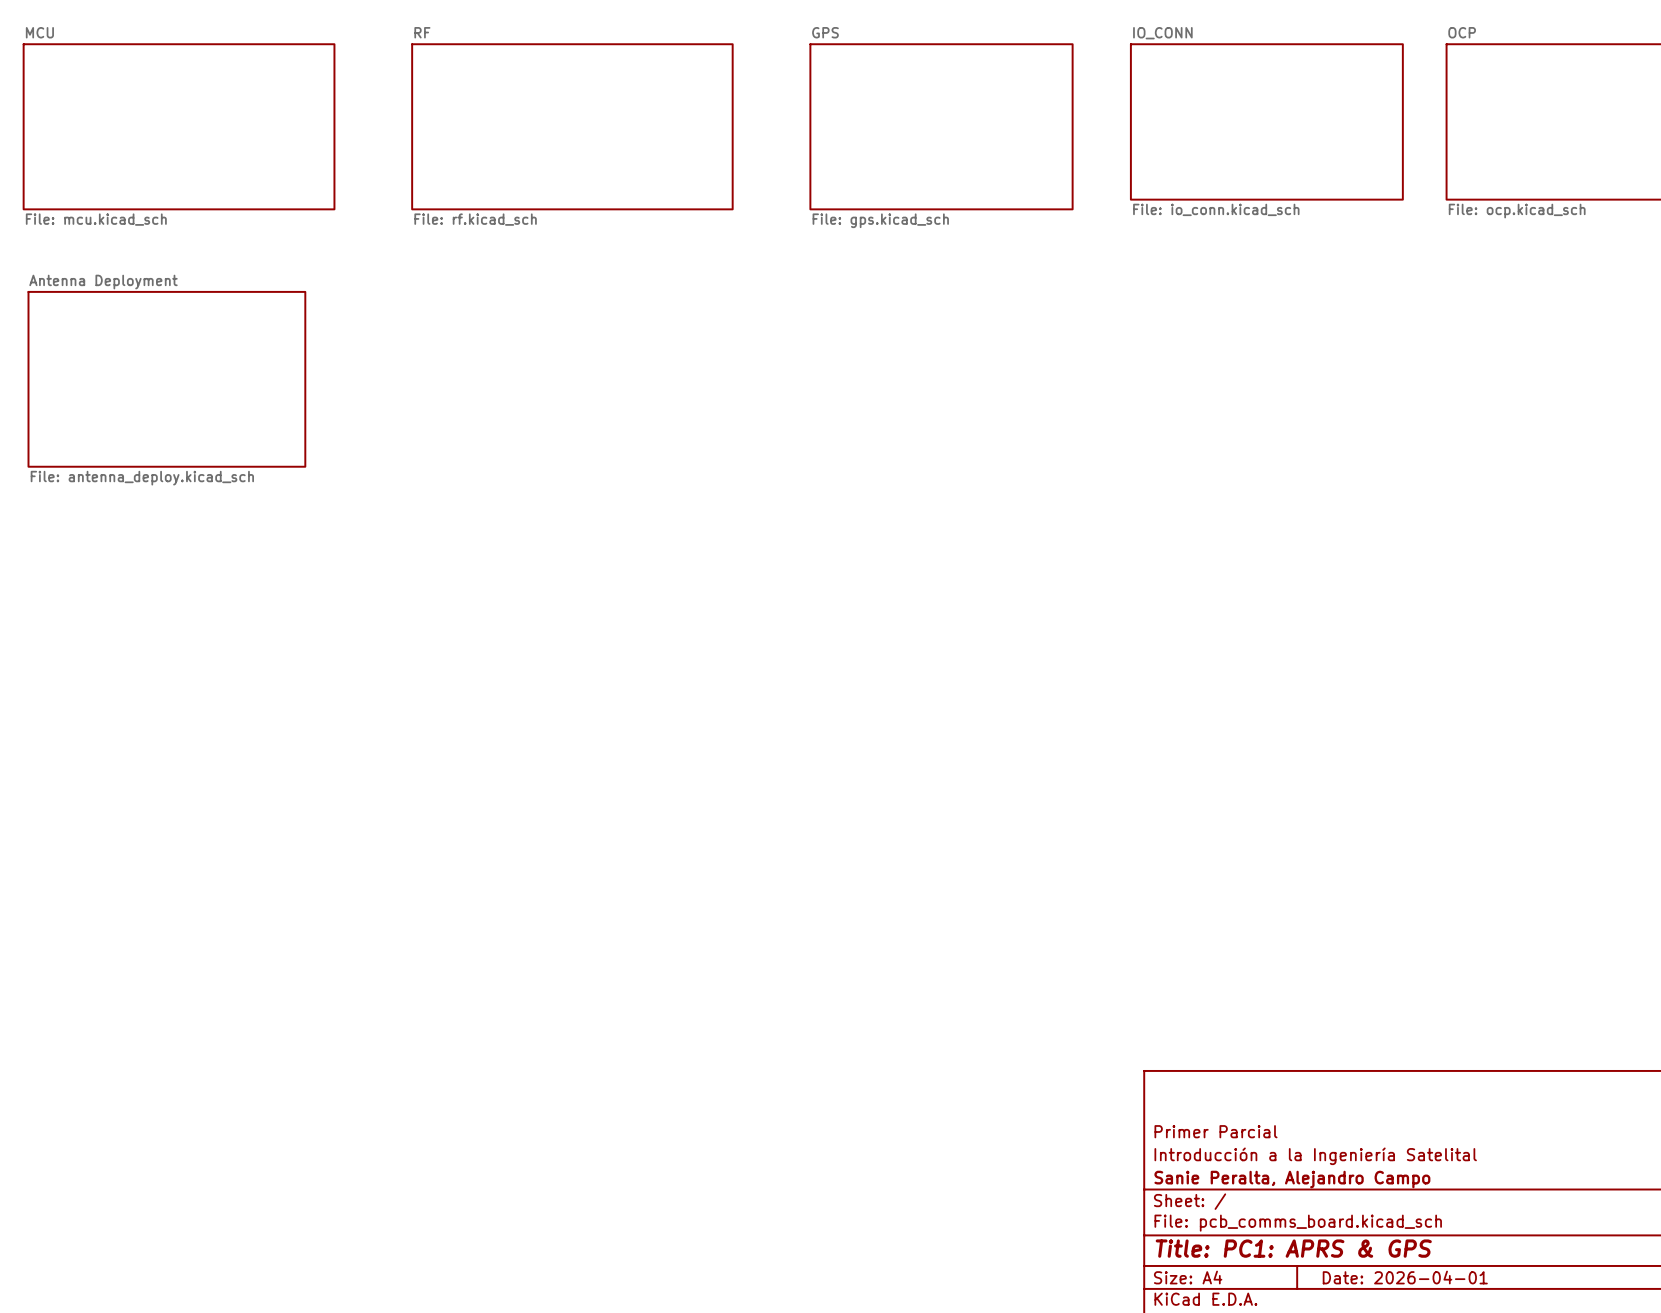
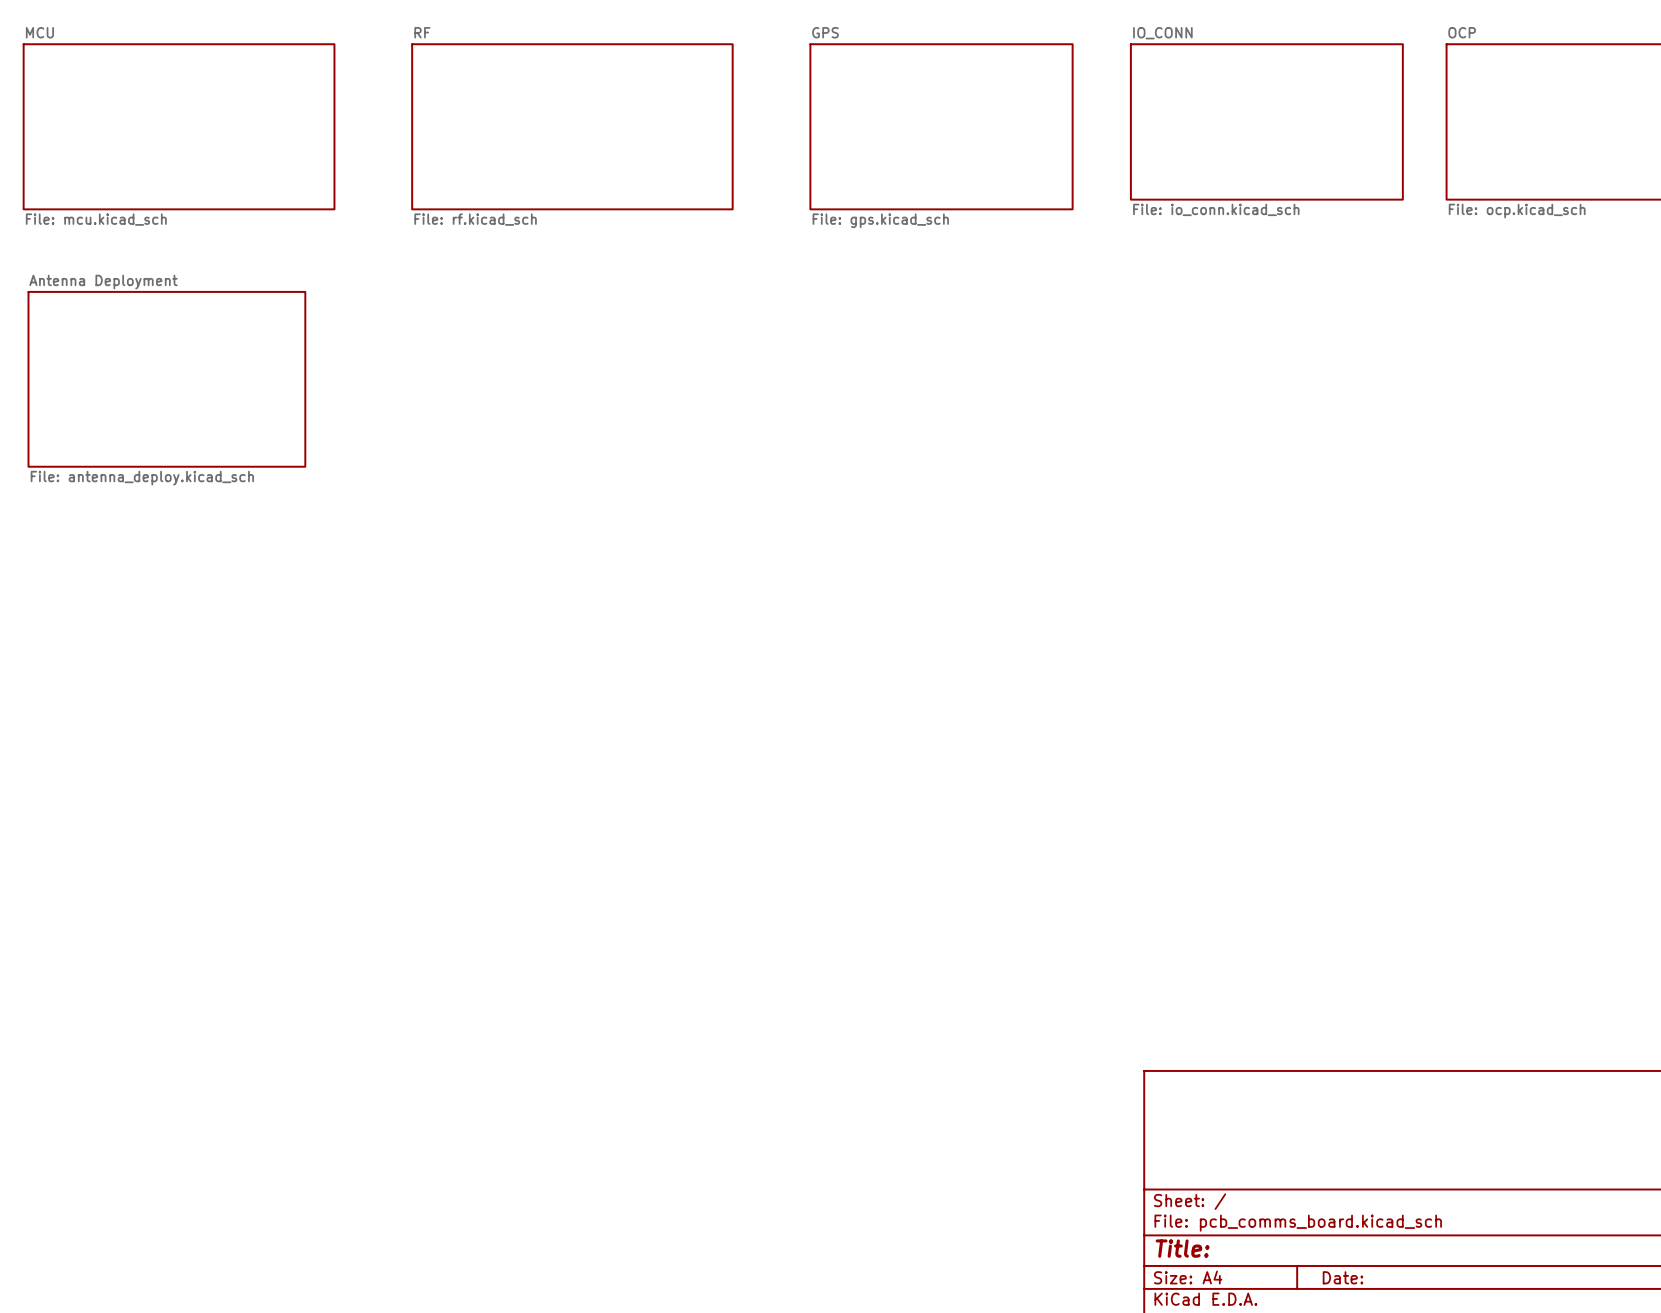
title block: Primer Parcial (1215, 1131) -> none
title block: Introducción a la Ingeniería Satelital (1315, 1156) -> none
title block: Sanie Peralta, Alejandro Campo (1292, 1179) -> none
title block: Title: PC1: APRS & GPS (1293, 1248) -> Title: (1182, 1248)
title block: Date: 2026-04-01 (1405, 1277) -> Date: (1343, 1277)

